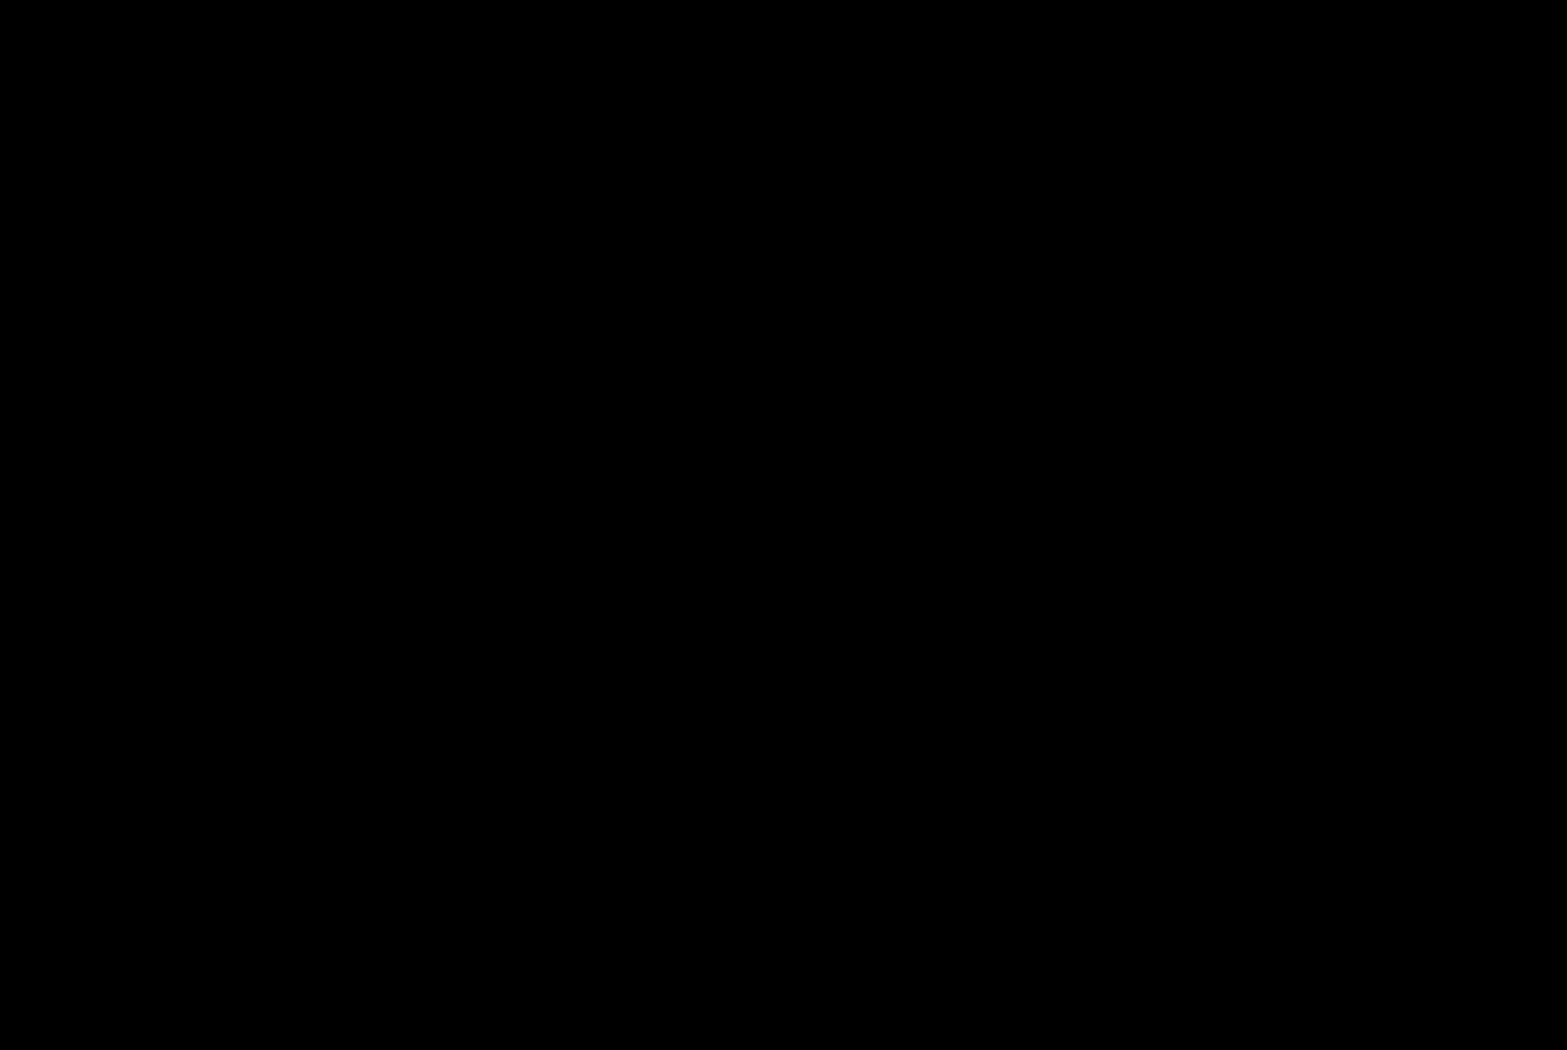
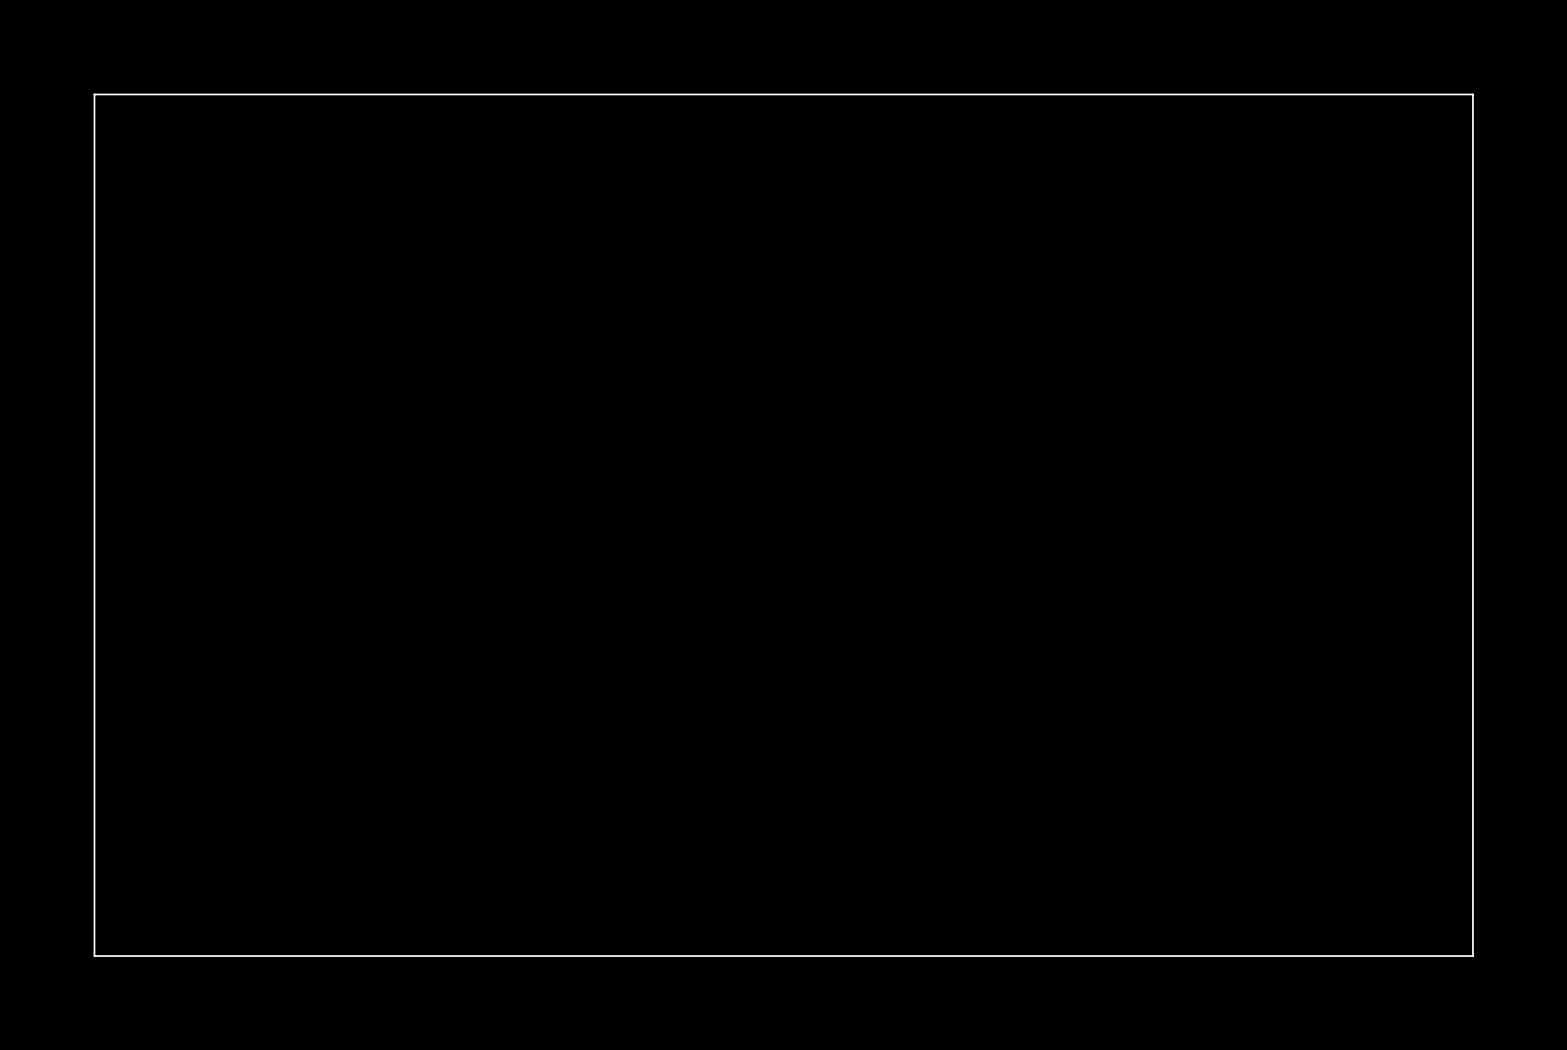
board edge: none -> (1472, 94) (1472, 956) (94, 956) (94, 94) (1472, 94)

